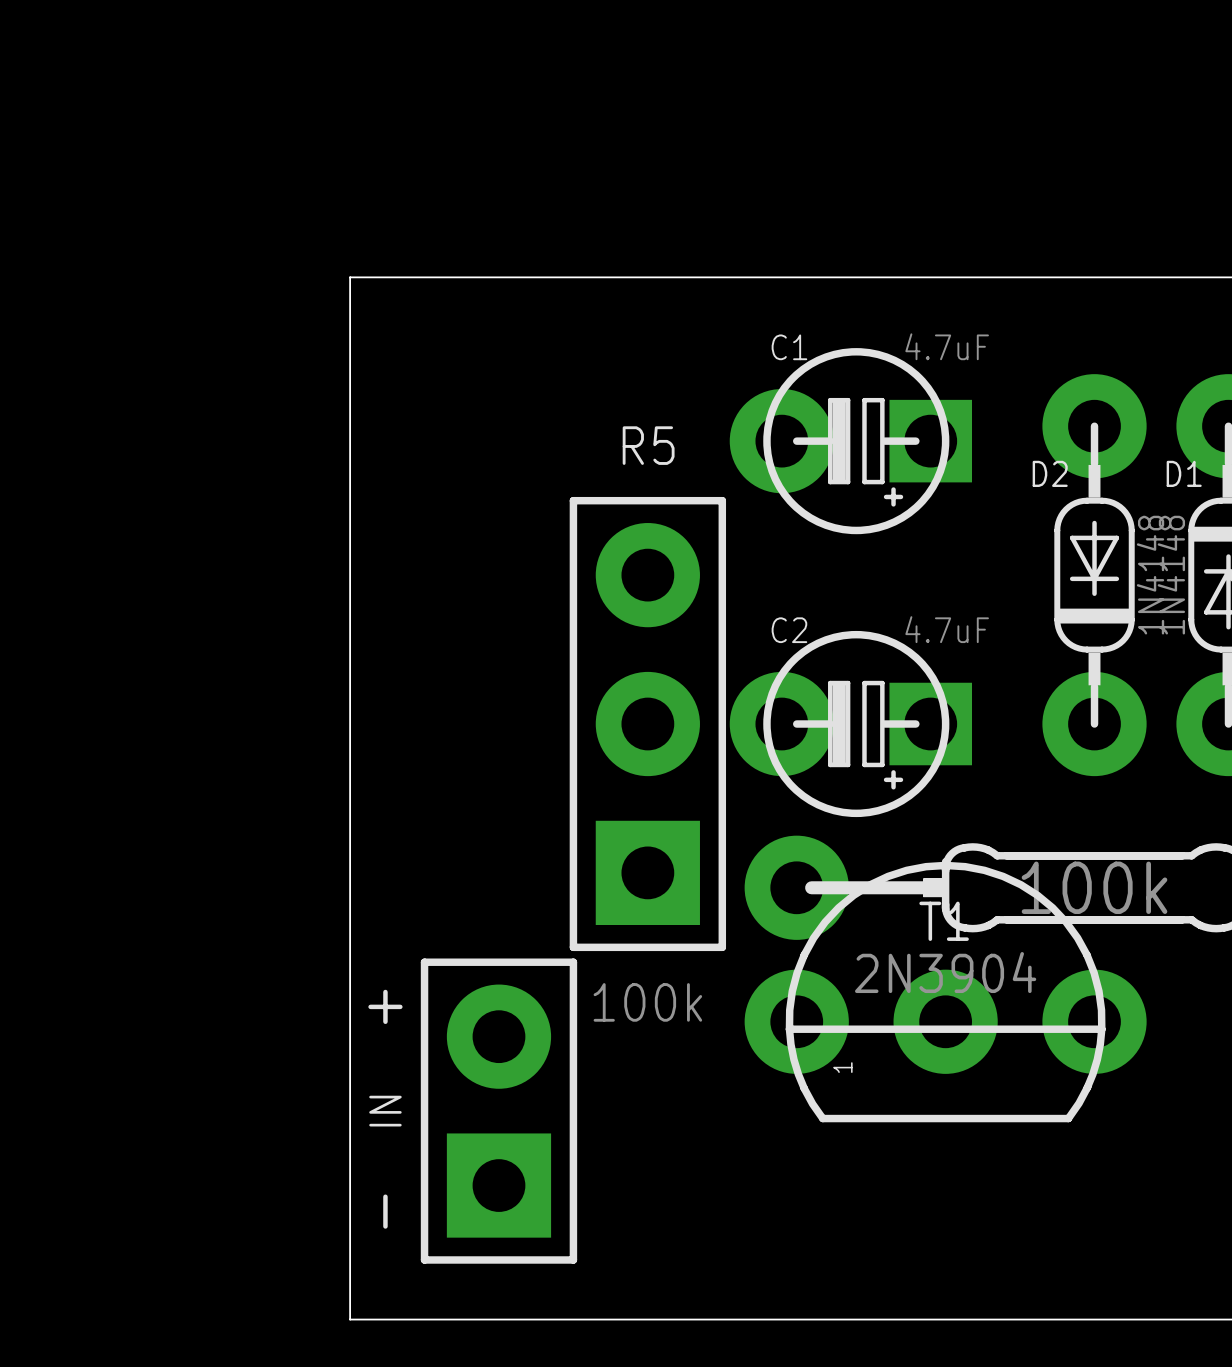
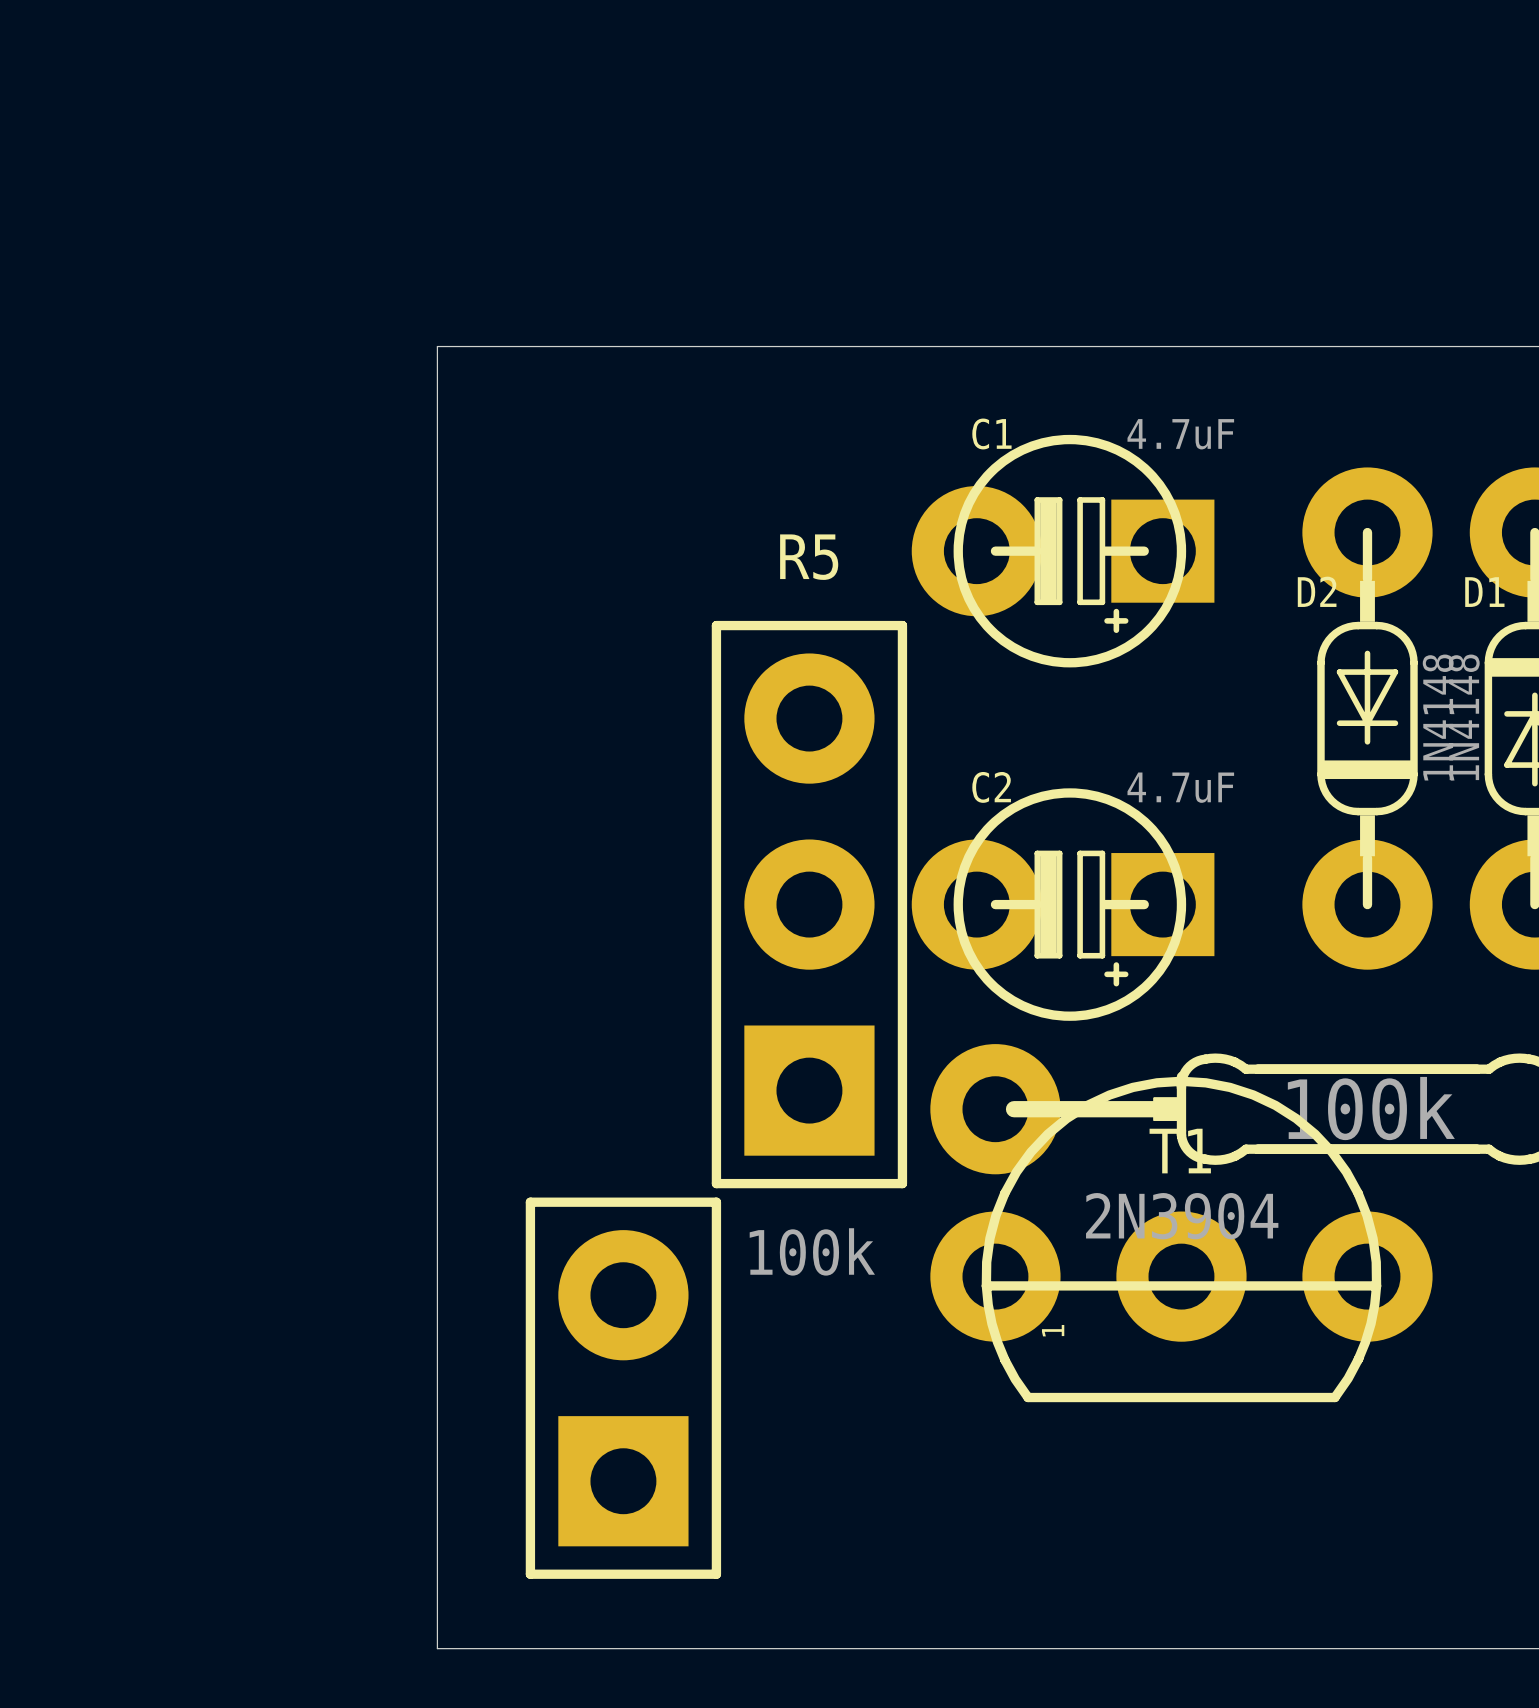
IN: (472, 1111) -> none

